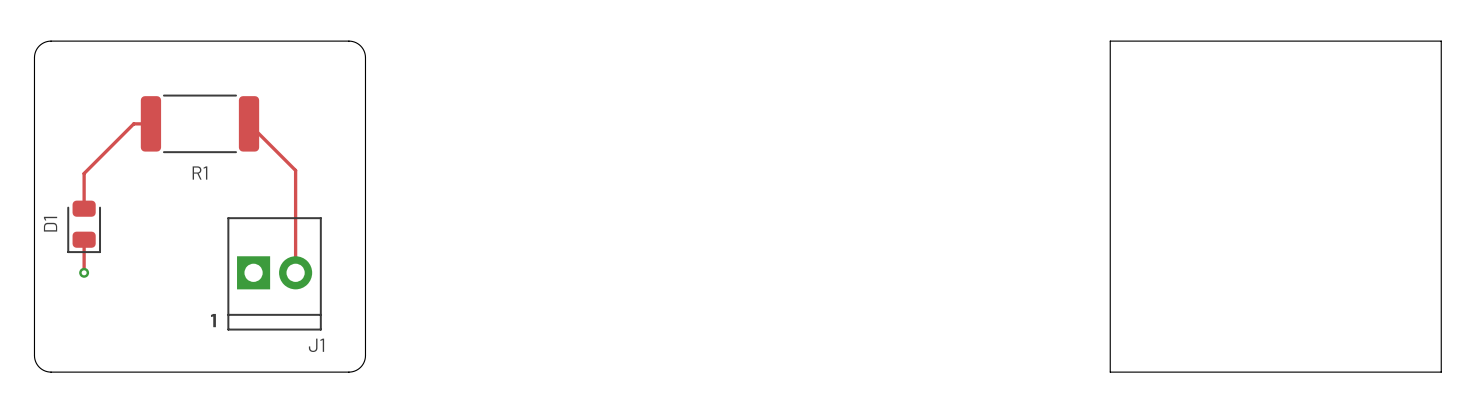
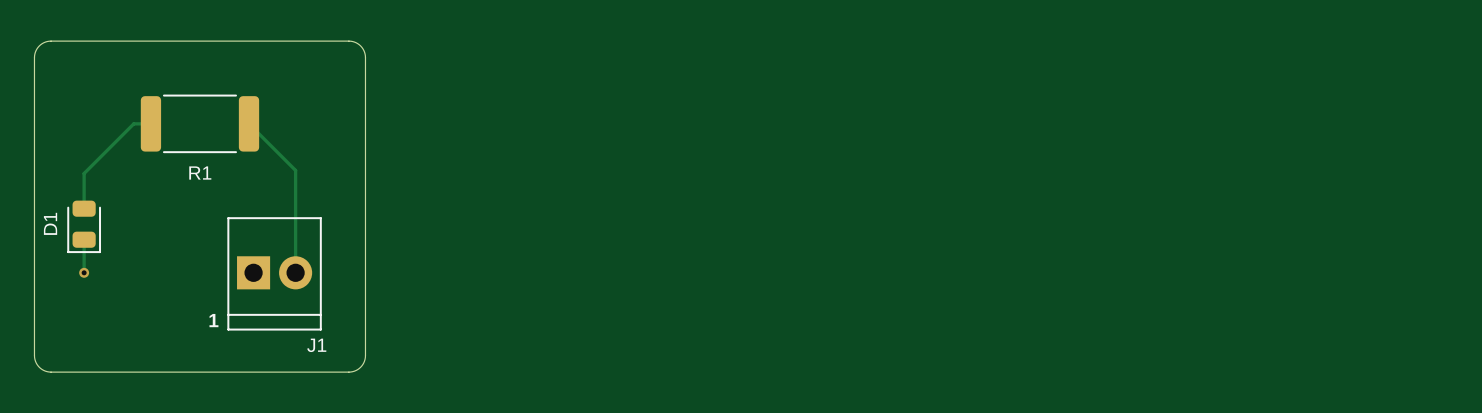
board edge: (1110, 41) (1441, 41) (1441, 372) (1110, 372) (1110, 41) -> none

